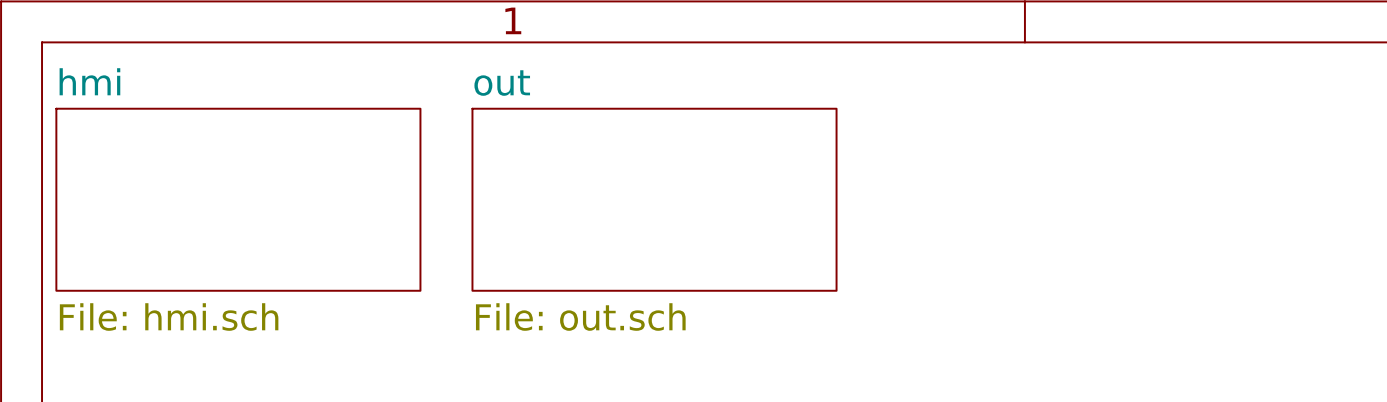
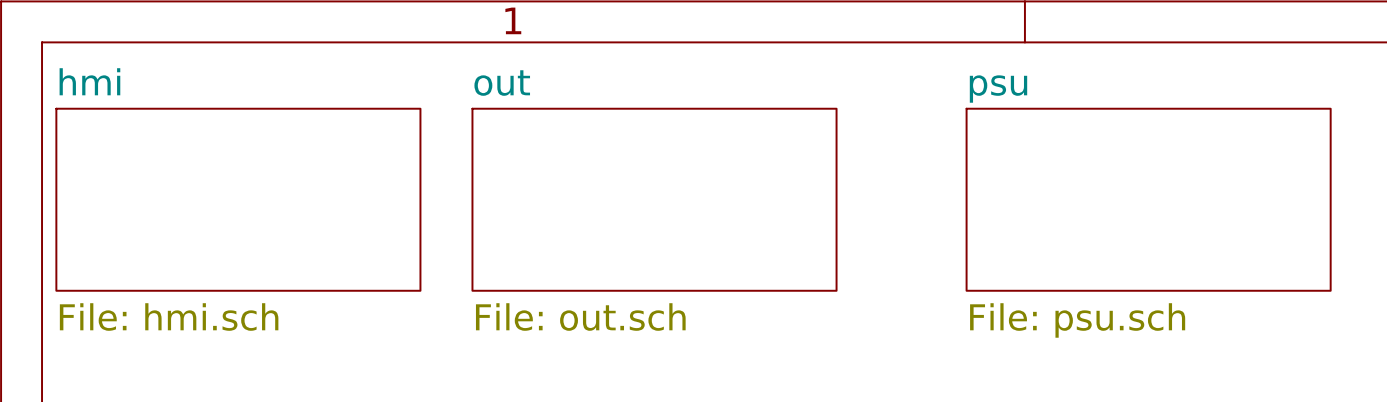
sheet psu: none -> File: psu.sch (1148, 199)

